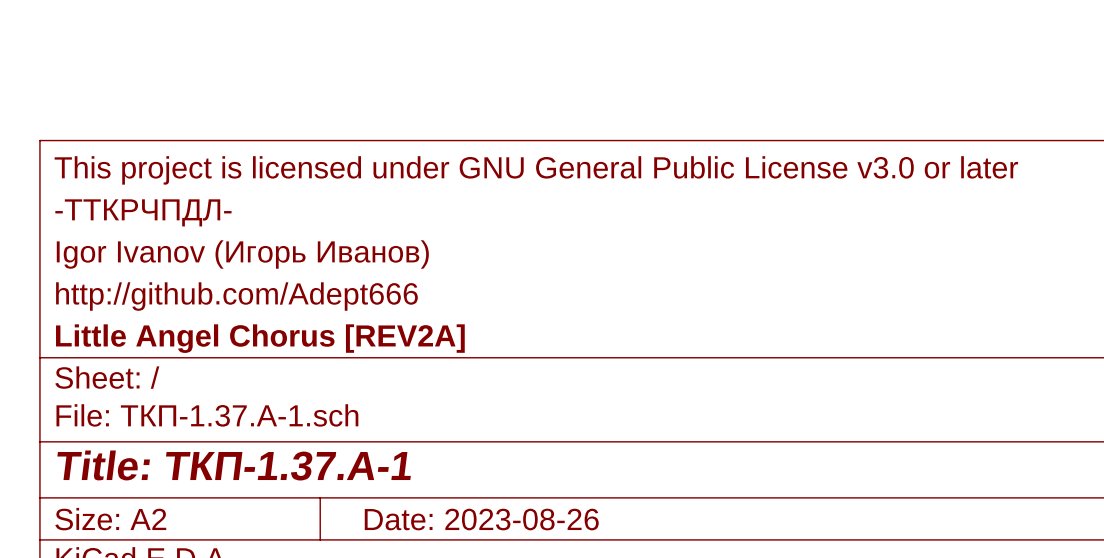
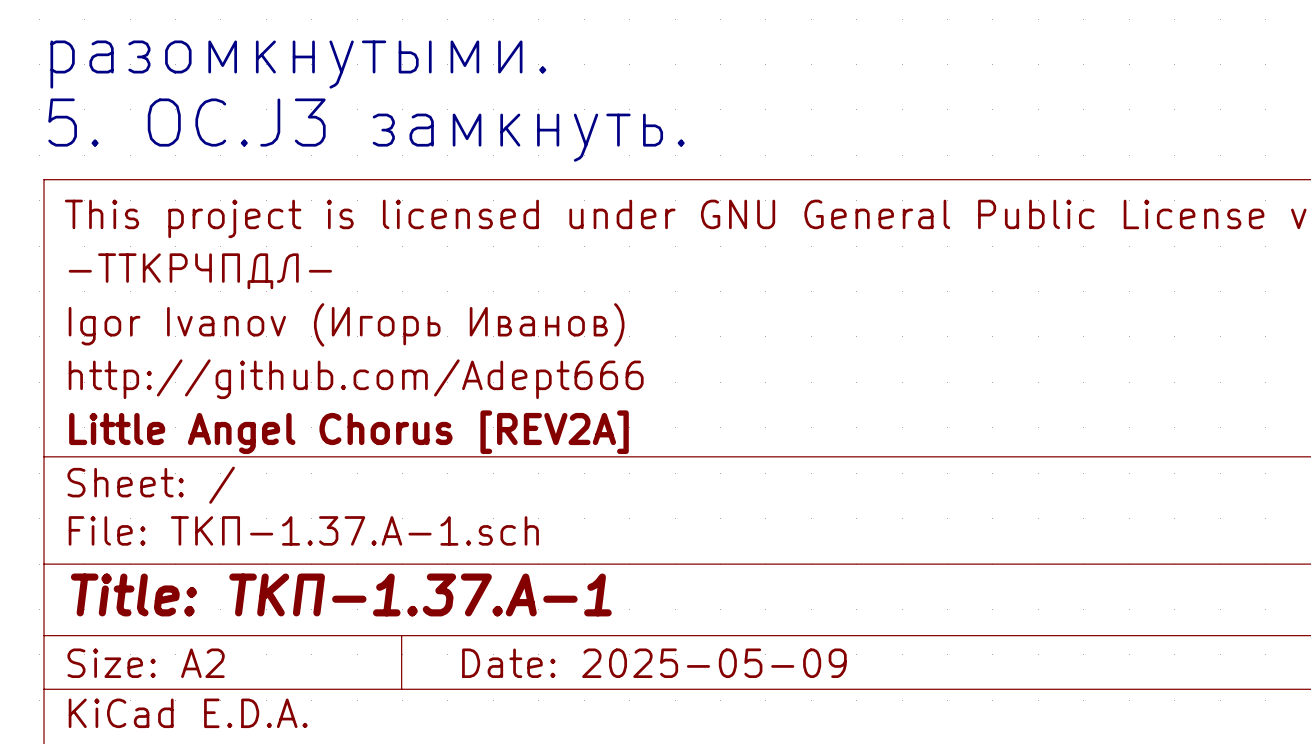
text: none -> разомкнутыми. (298, 64)
text: none -> 5. OC.J3 замкнуть. (366, 130)
title block: Date: 2023-08-26 (481, 519) -> Date: 2025-05-09 (654, 663)

